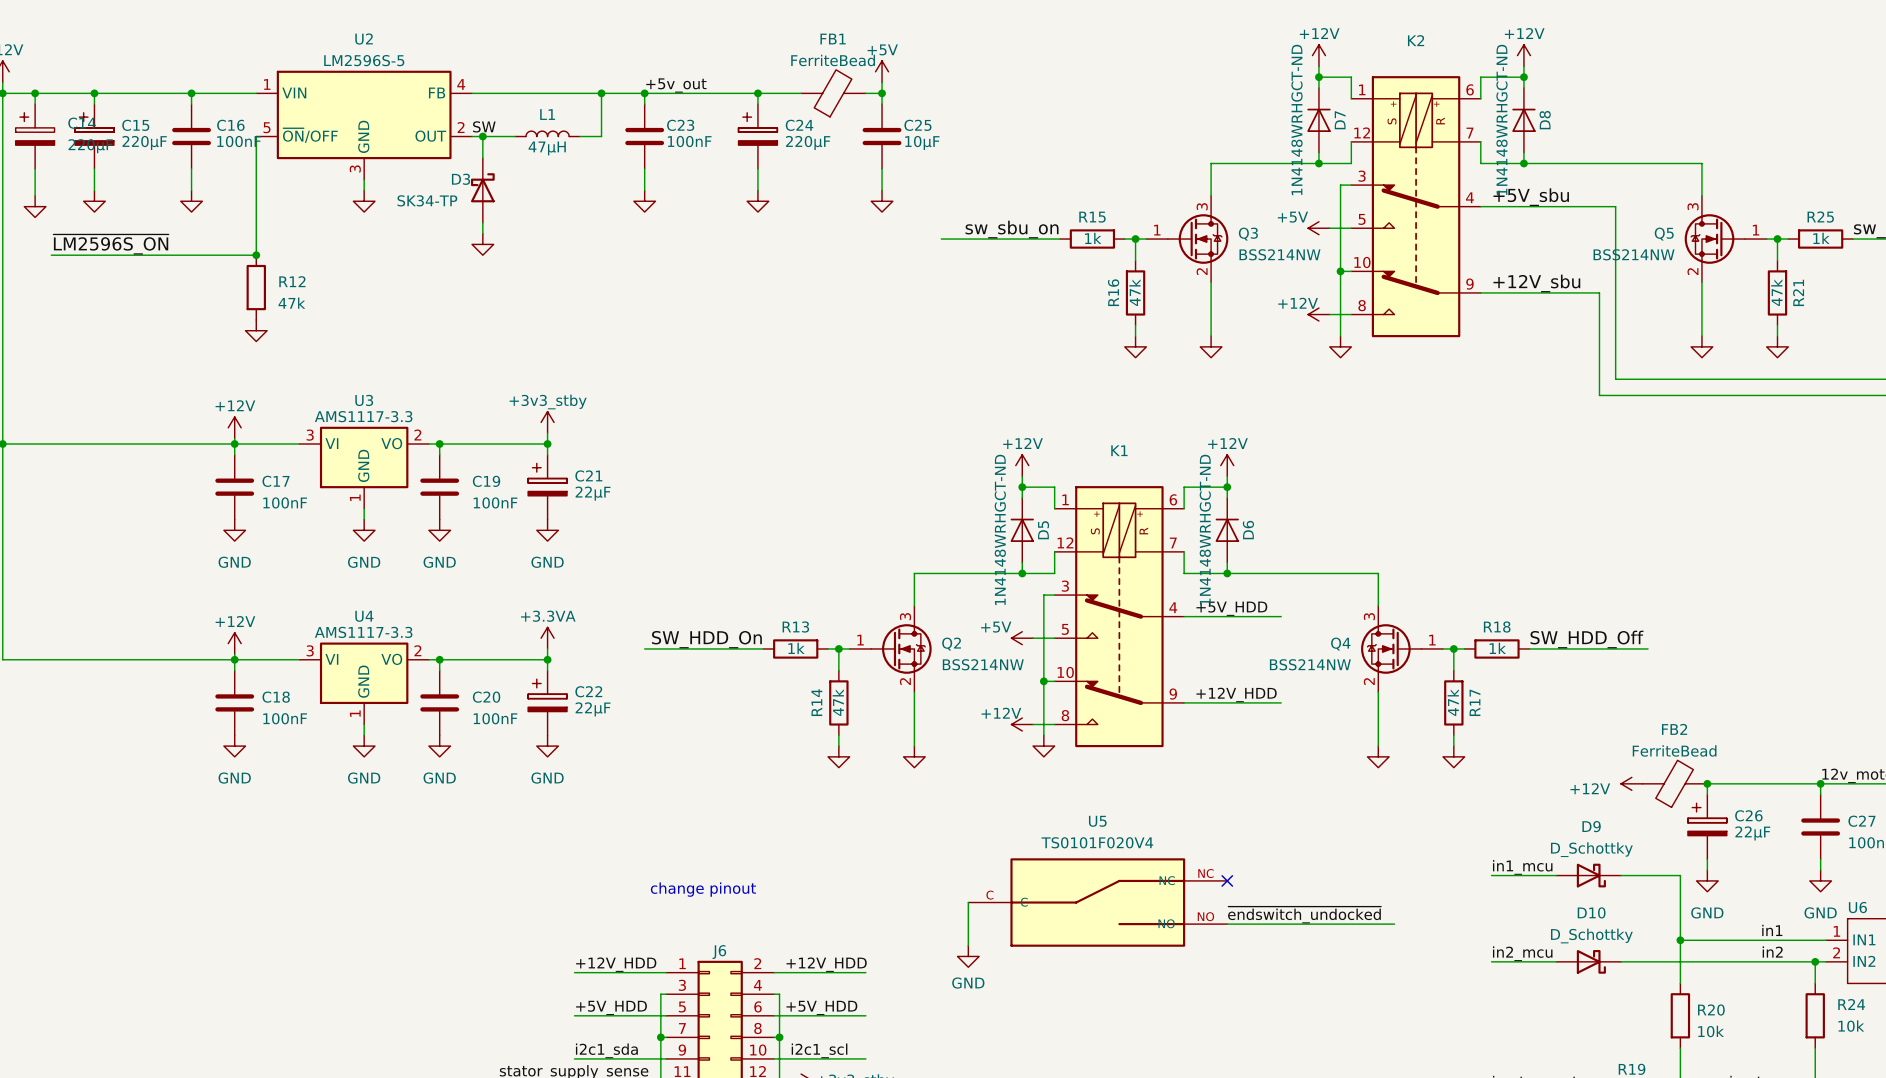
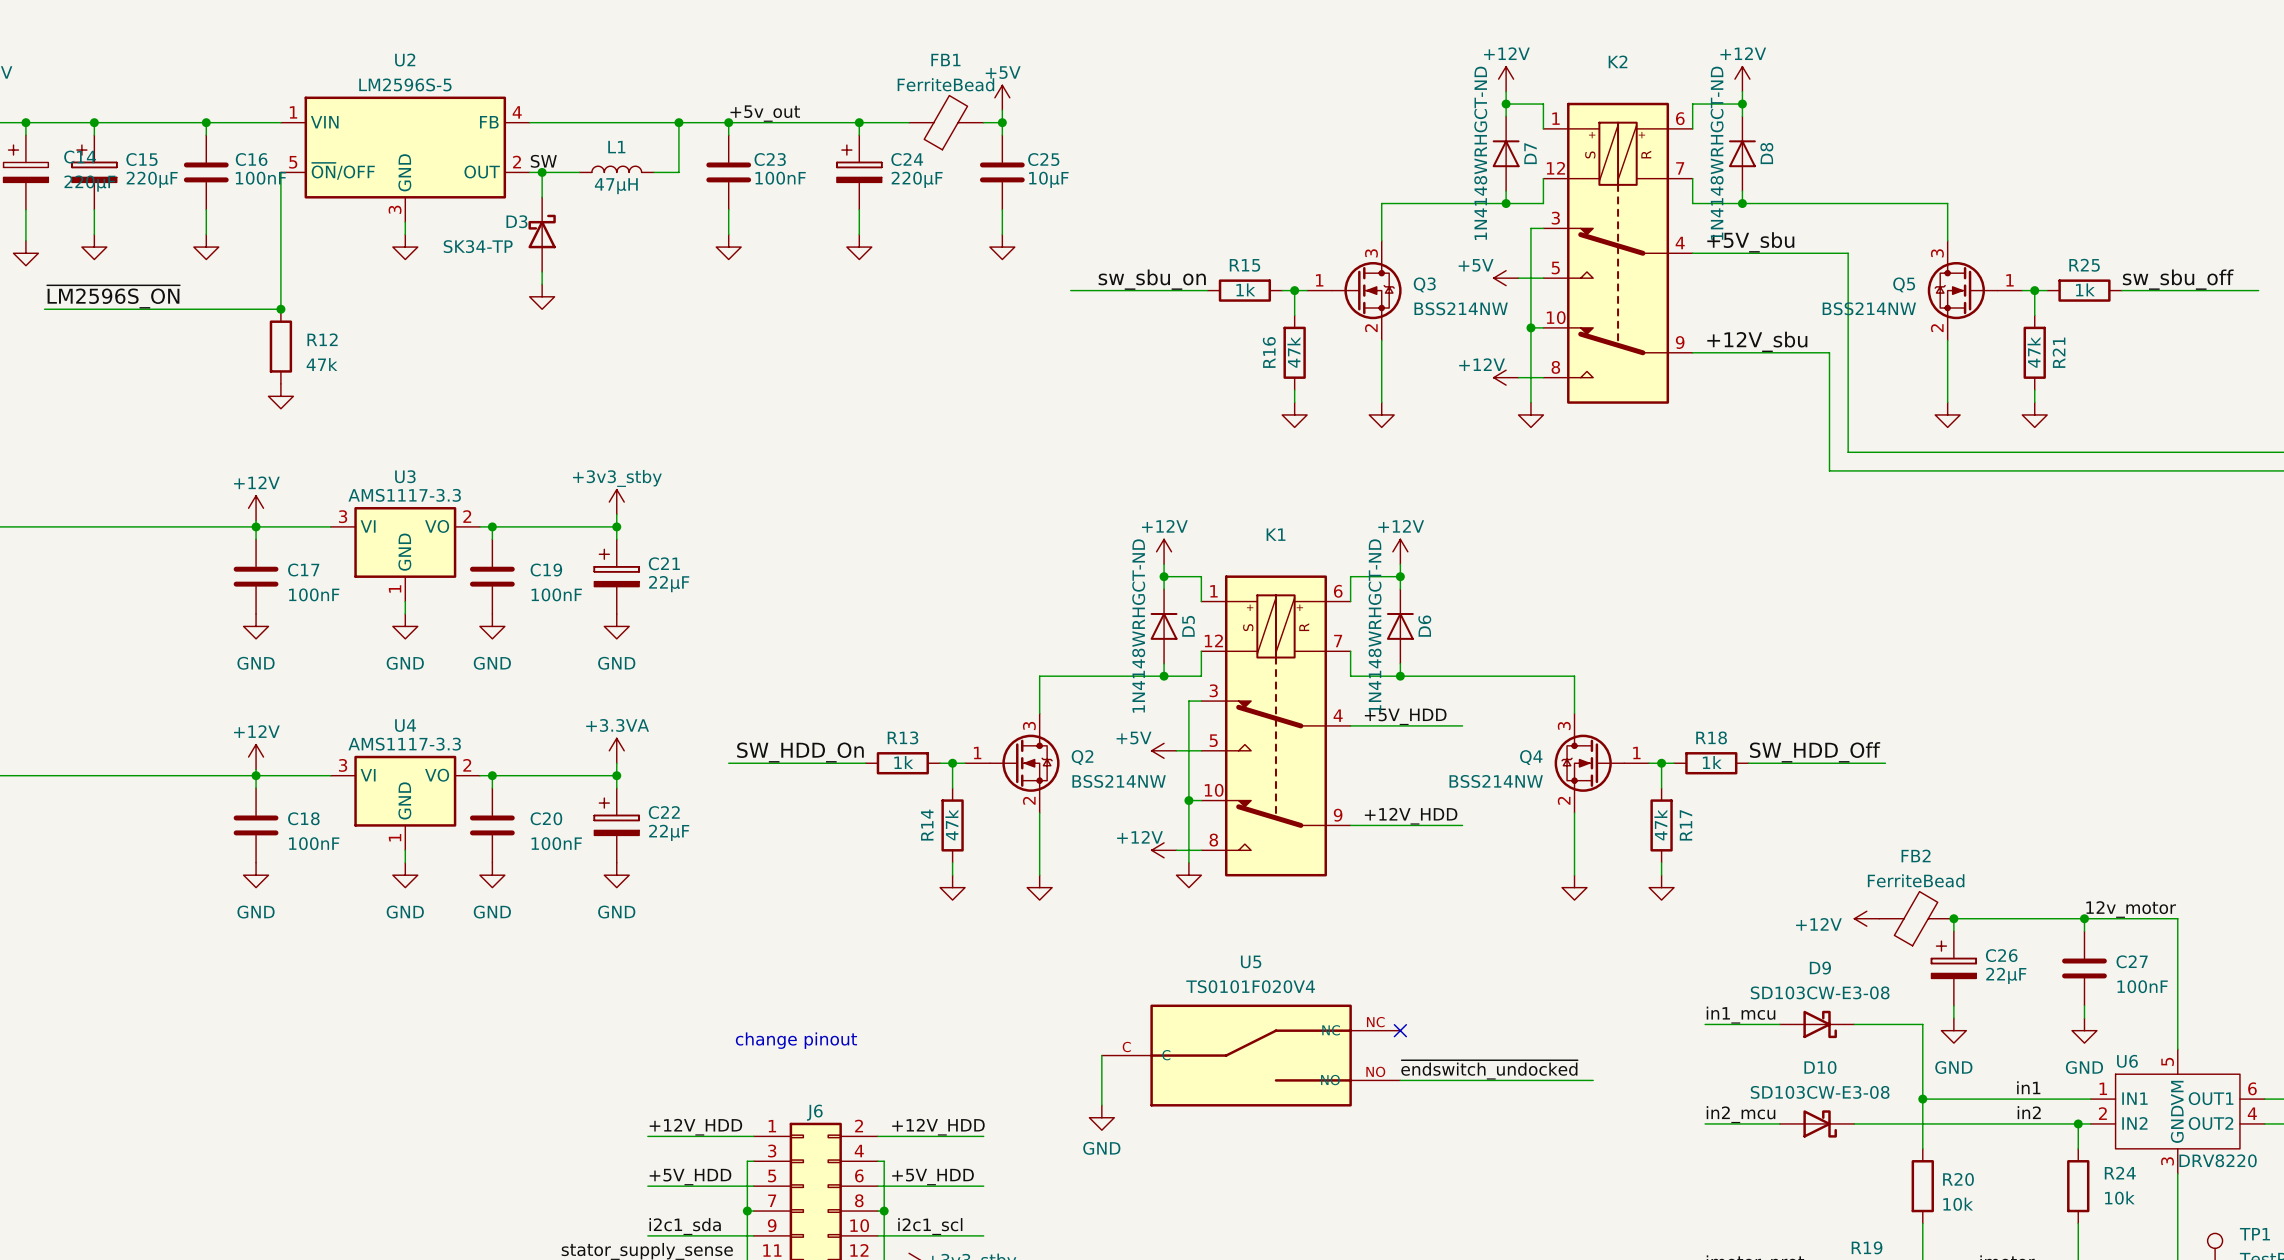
D9 value: D_Schottky (1591, 849) -> SD103CW-E3-08 (1820, 992)
D10 value: D_Schottky (1591, 936) -> SD103CW-E3-08 (1820, 1092)

